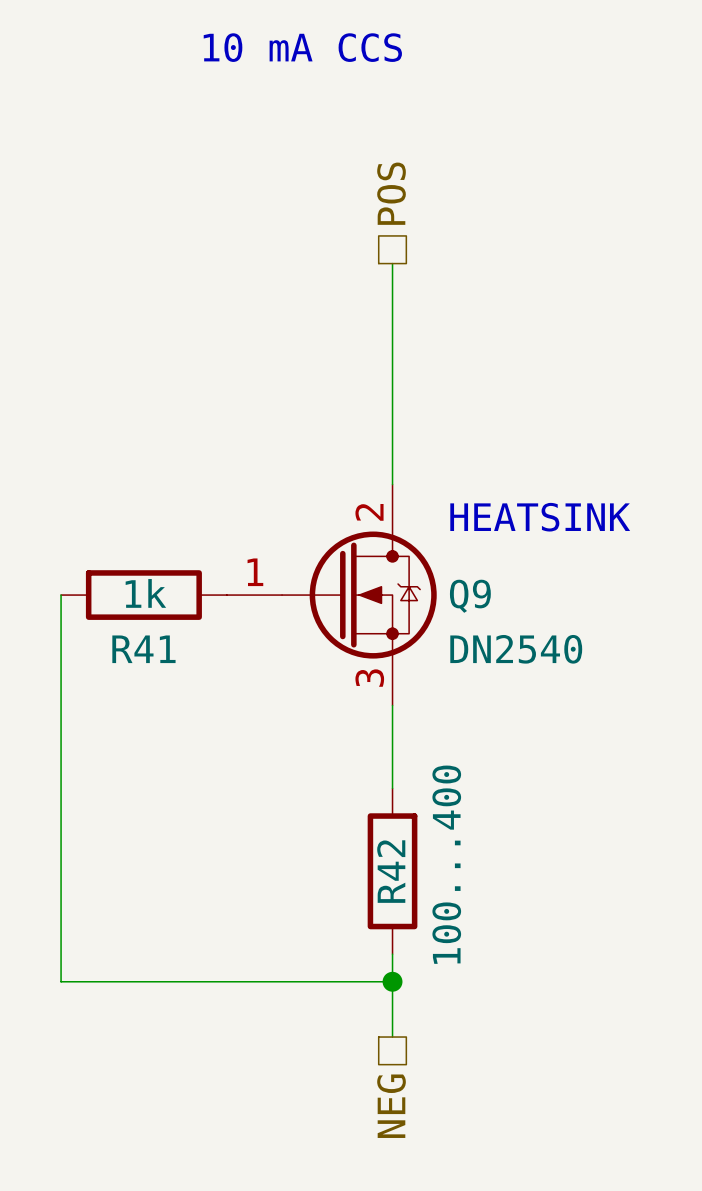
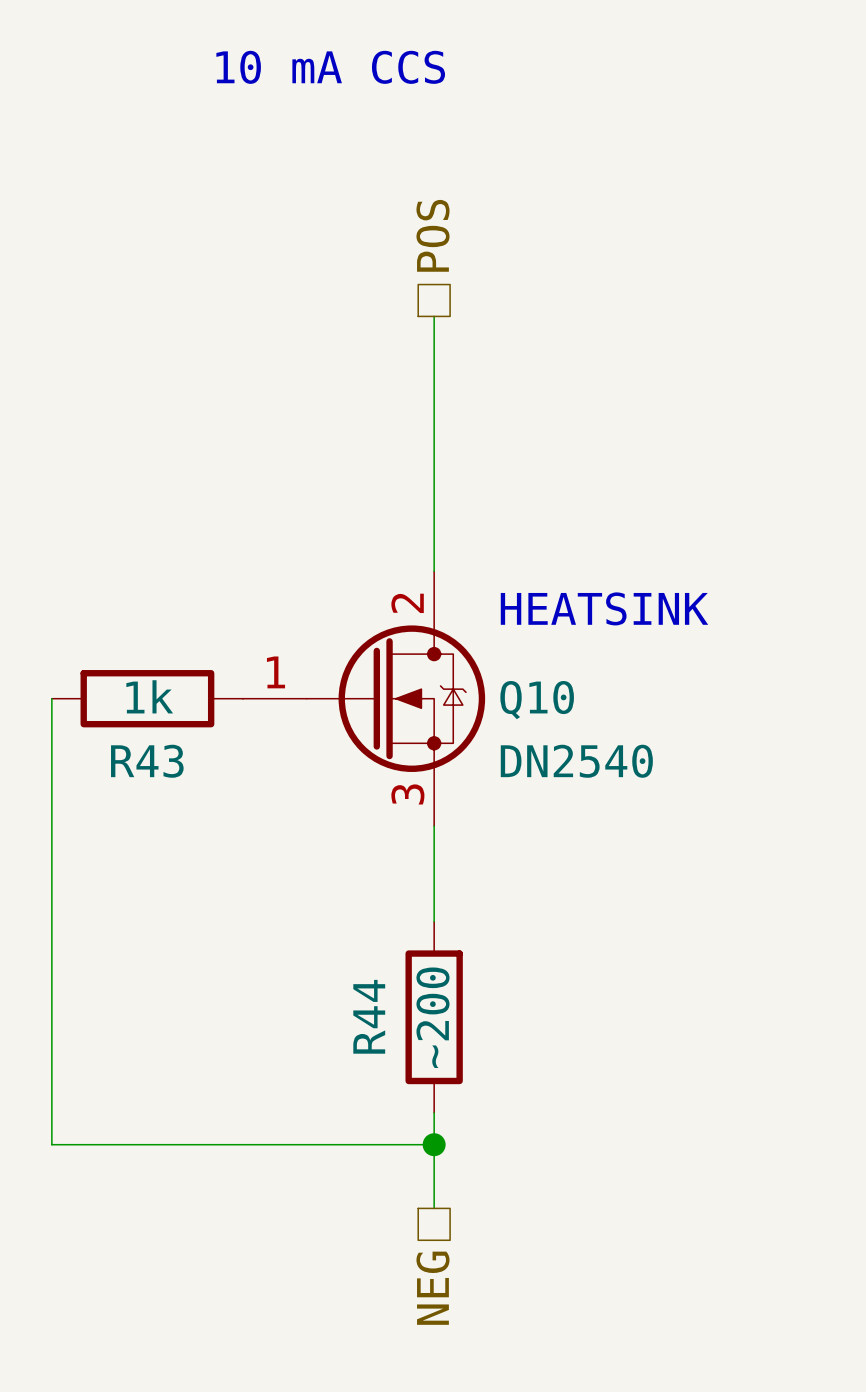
Q9 name: Q9 (470, 596) -> Q10 (537, 700)
R41 name: R41 (143, 649) -> R43 (147, 761)
R42 value: 100...400 (446, 864) -> ~200 (432, 1017)
R42 name: R42 (391, 871) -> R44 (369, 1016)

